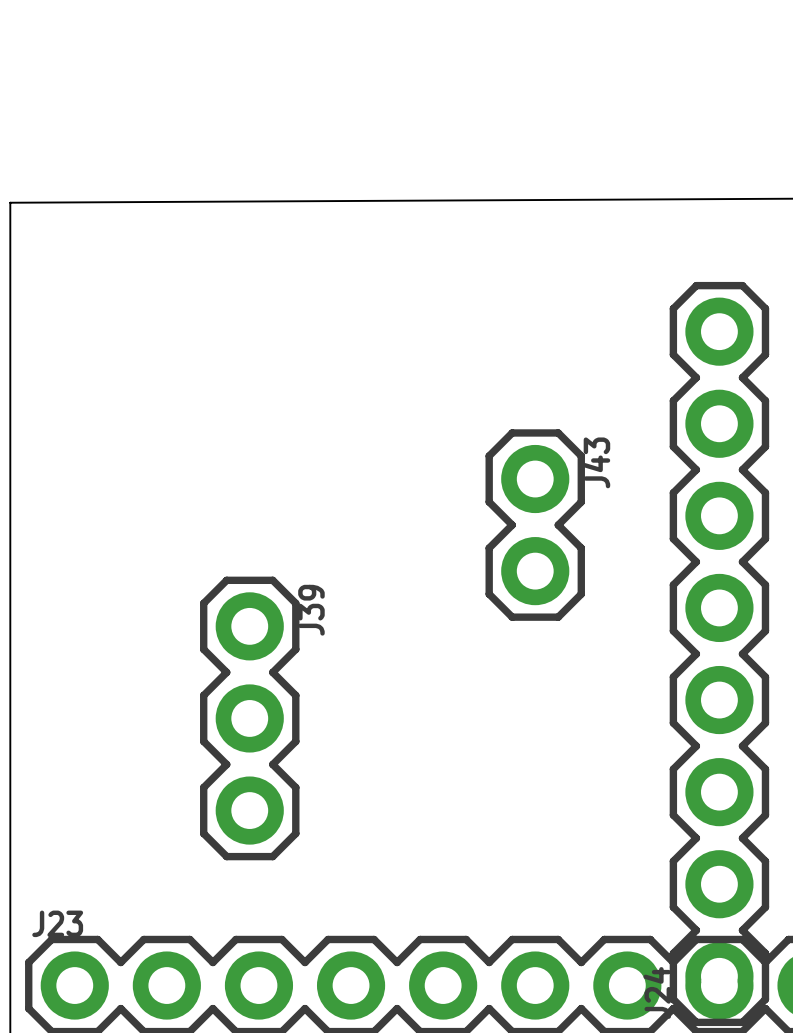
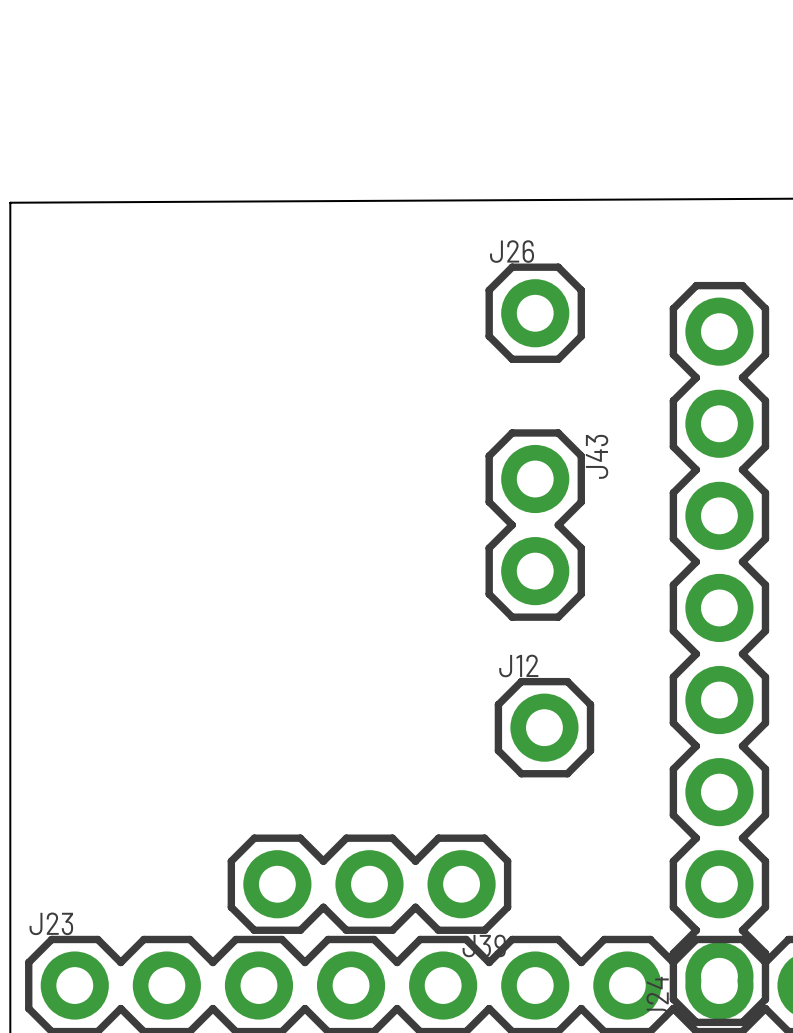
J26: none -> (535, 313)
J39 rotation: 0° (249, 718) -> 90° clockwise (369, 884)
J39 position: (249, 718) -> (369, 884)
J12: none -> (544, 727)

